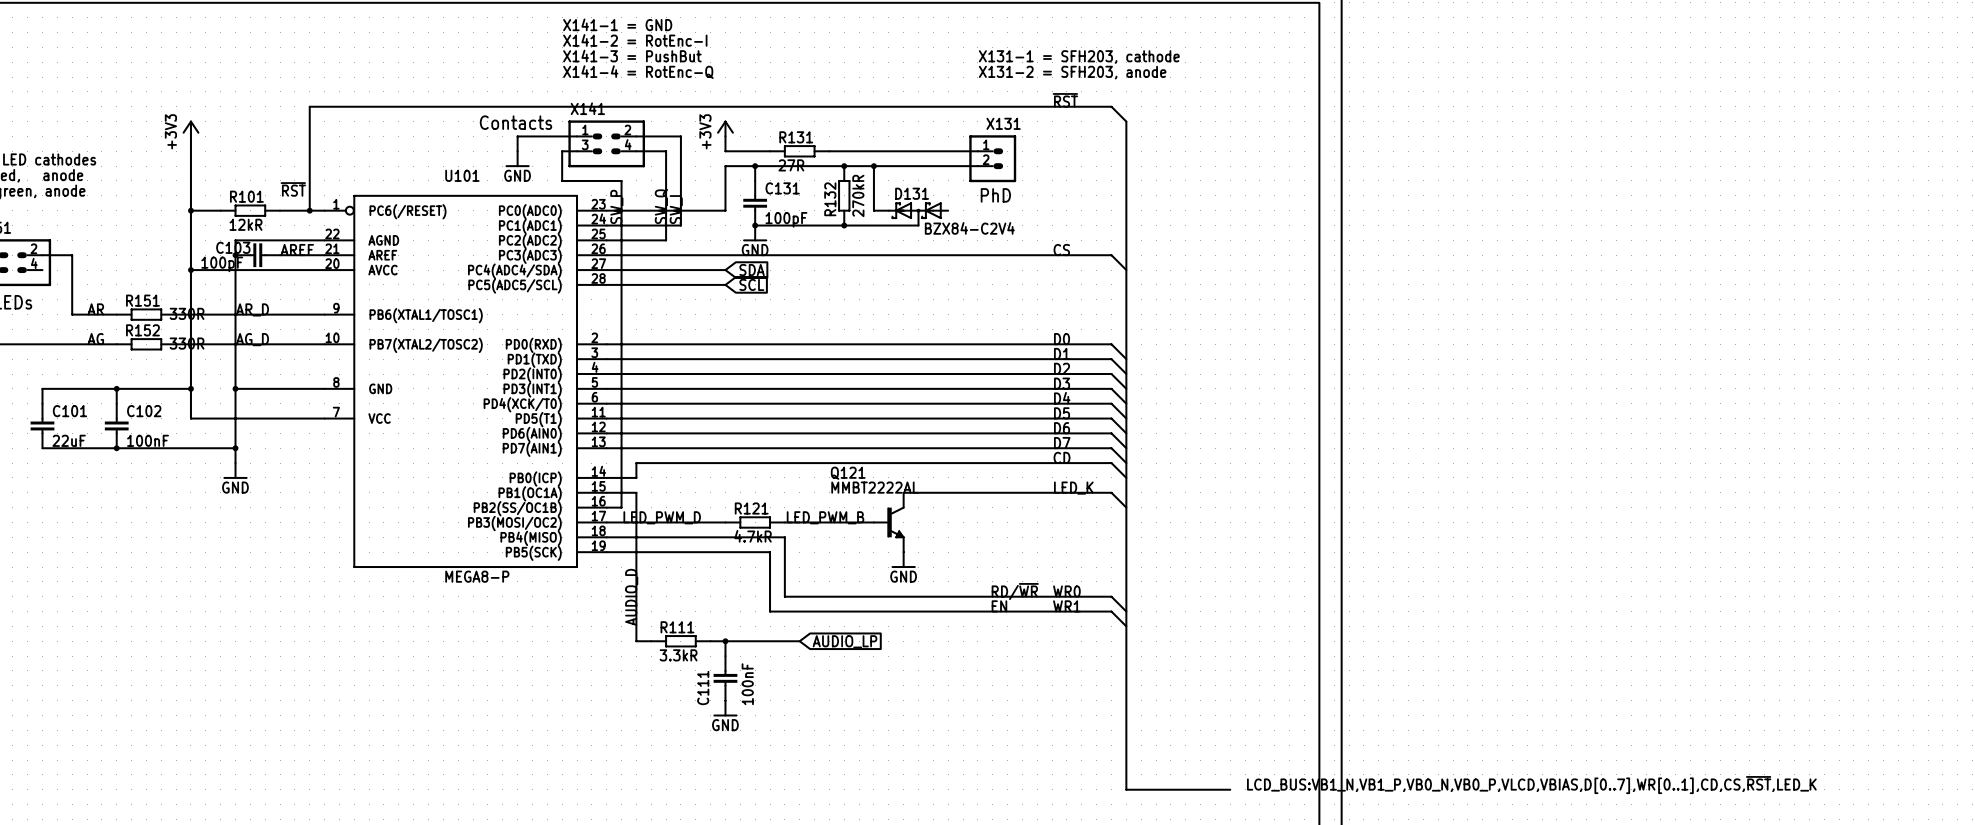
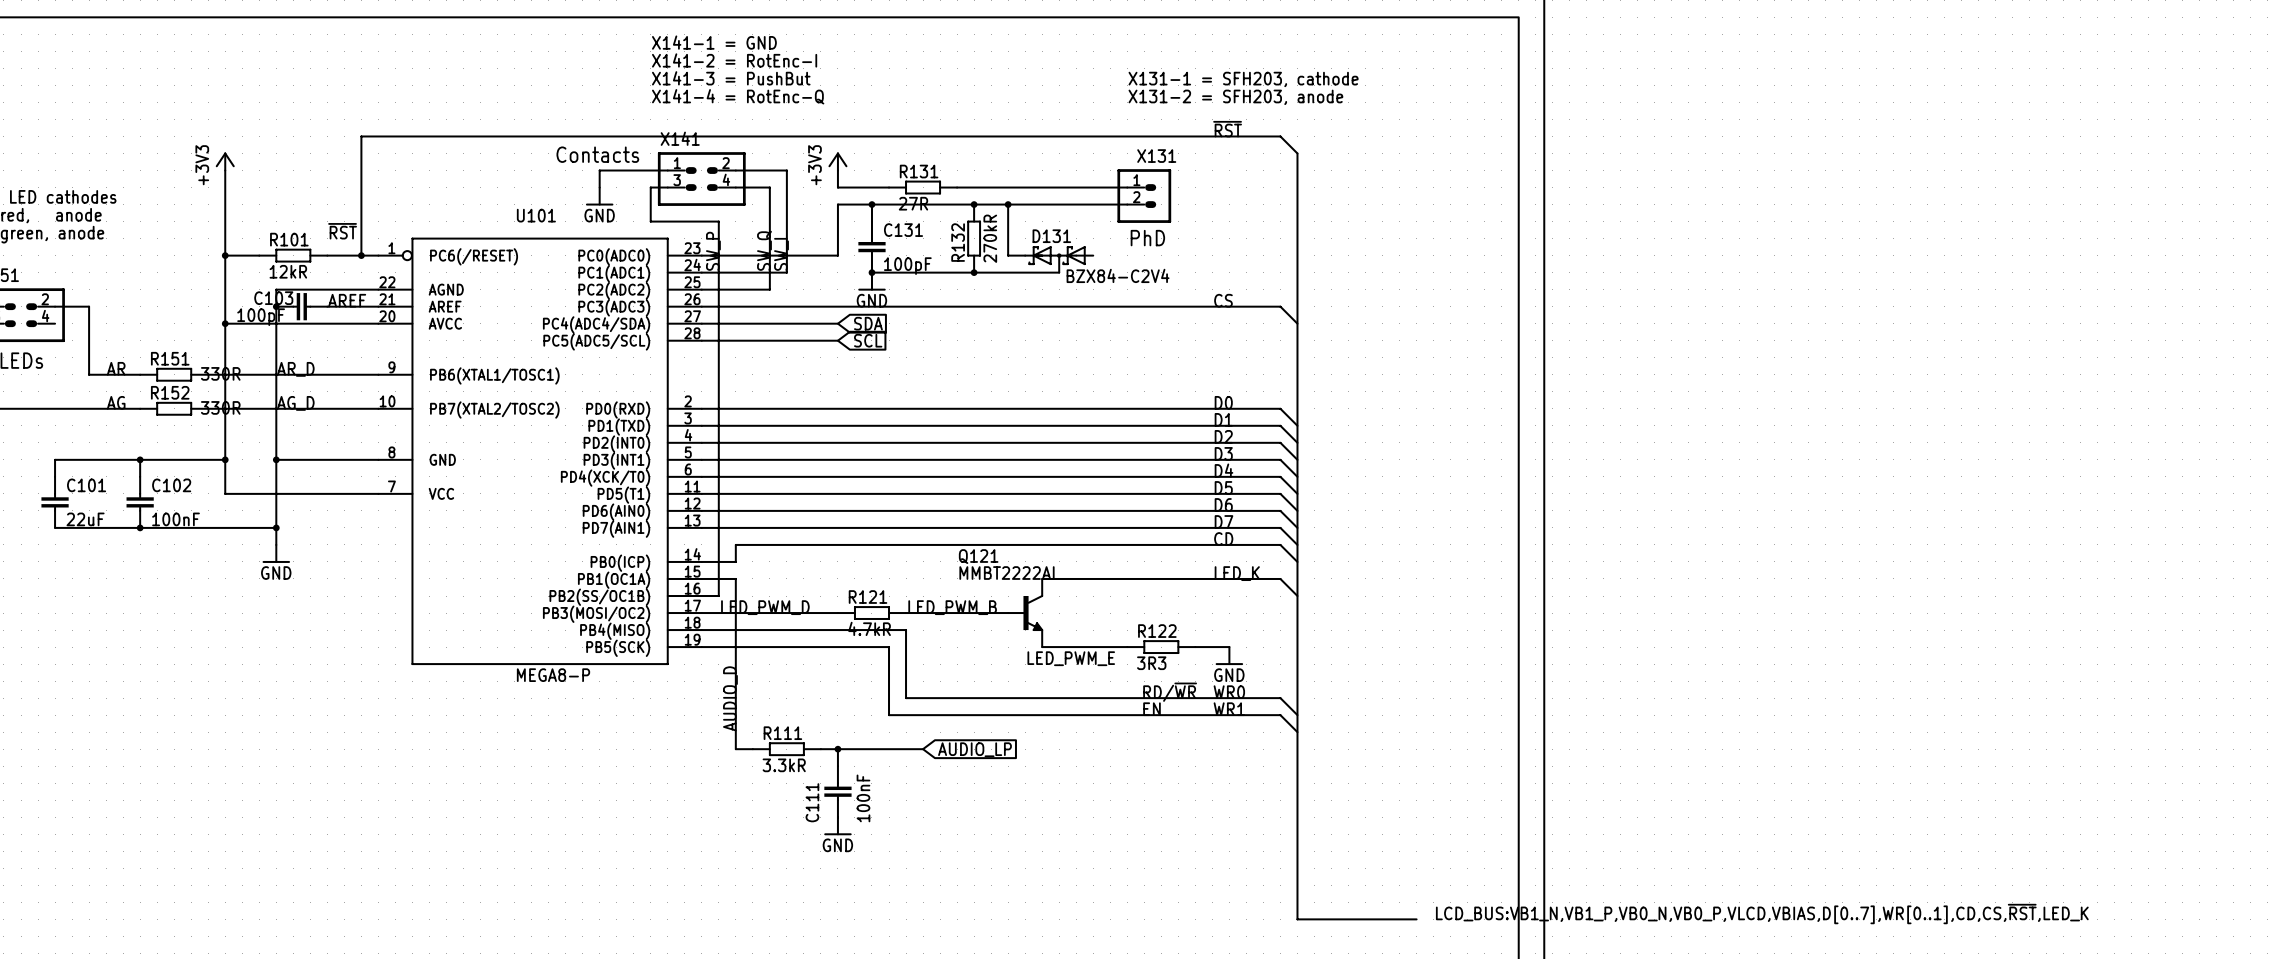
wire: none -> (1042, 647) (1127, 647)
R122: none -> 3R3 (1161, 647)
wire: none -> (1195, 647) (1229, 647)
power symbol: GND (903, 559) -> none
power symbol: none -> GND (1229, 655)
label: none -> LED_PWM_E (1071, 658)

